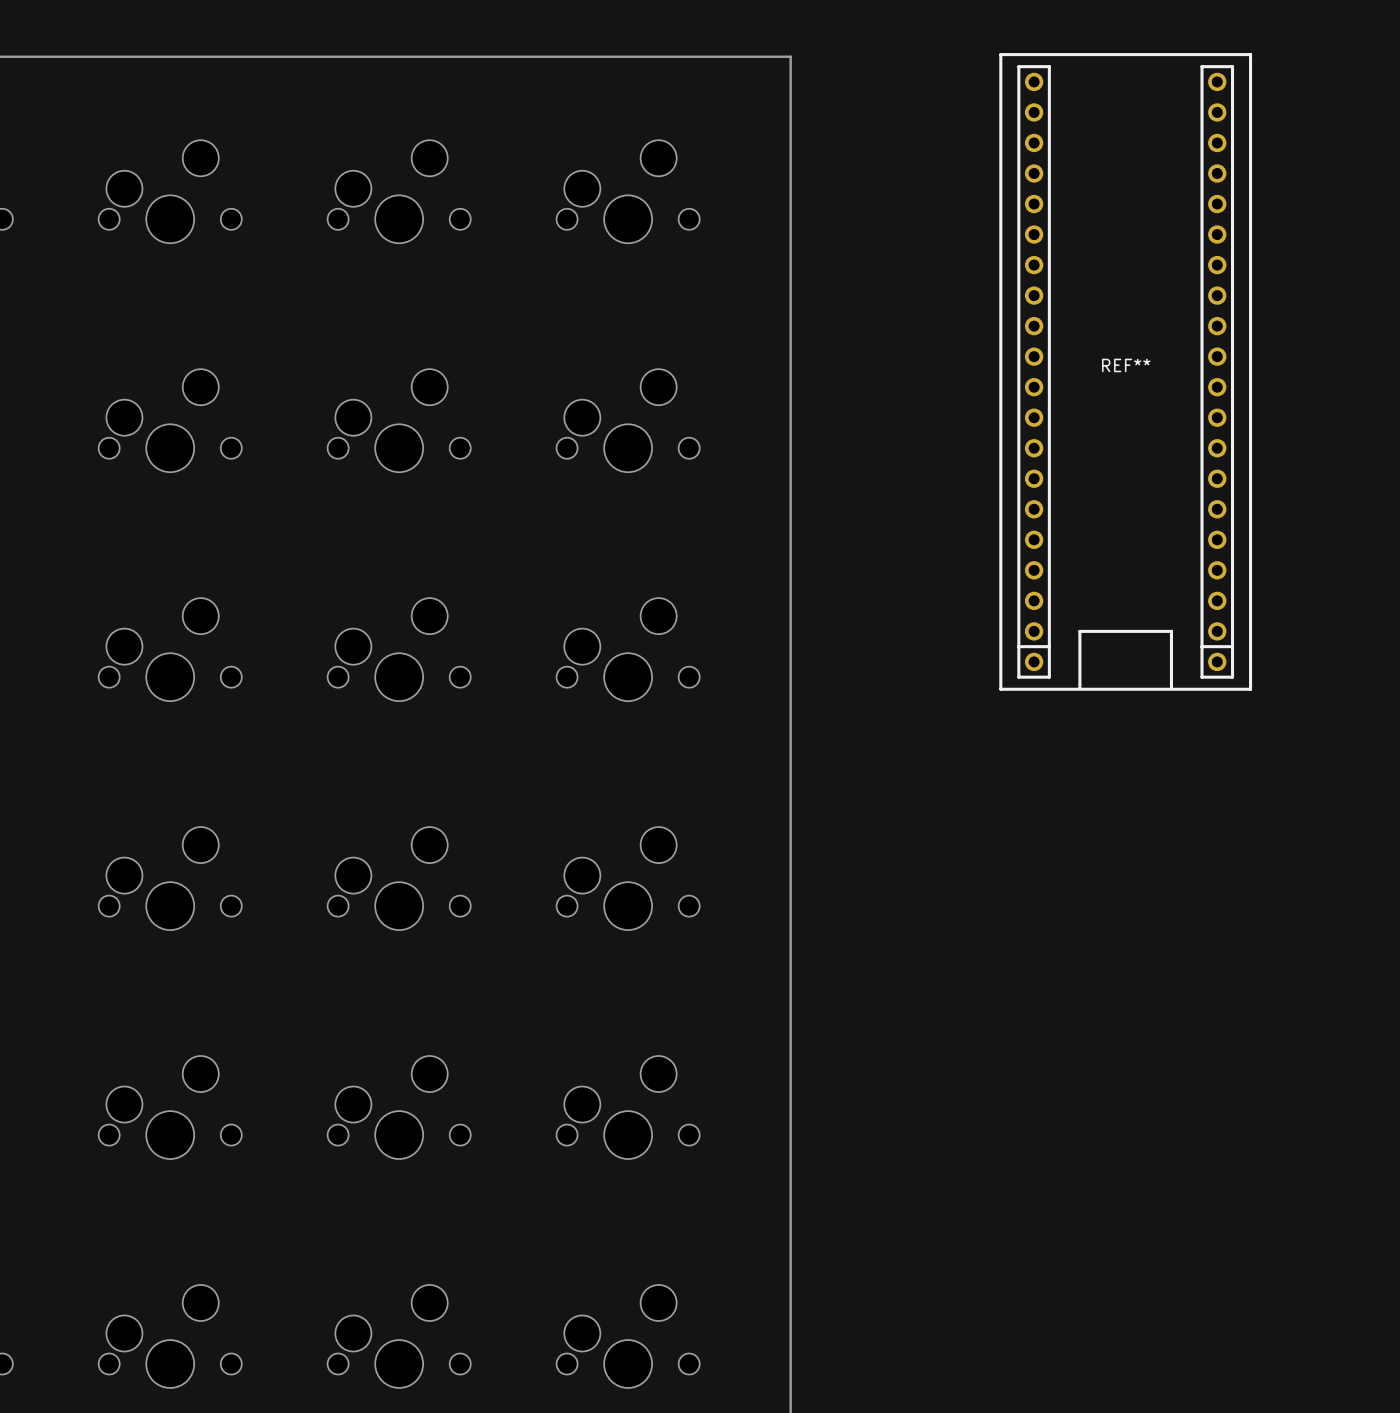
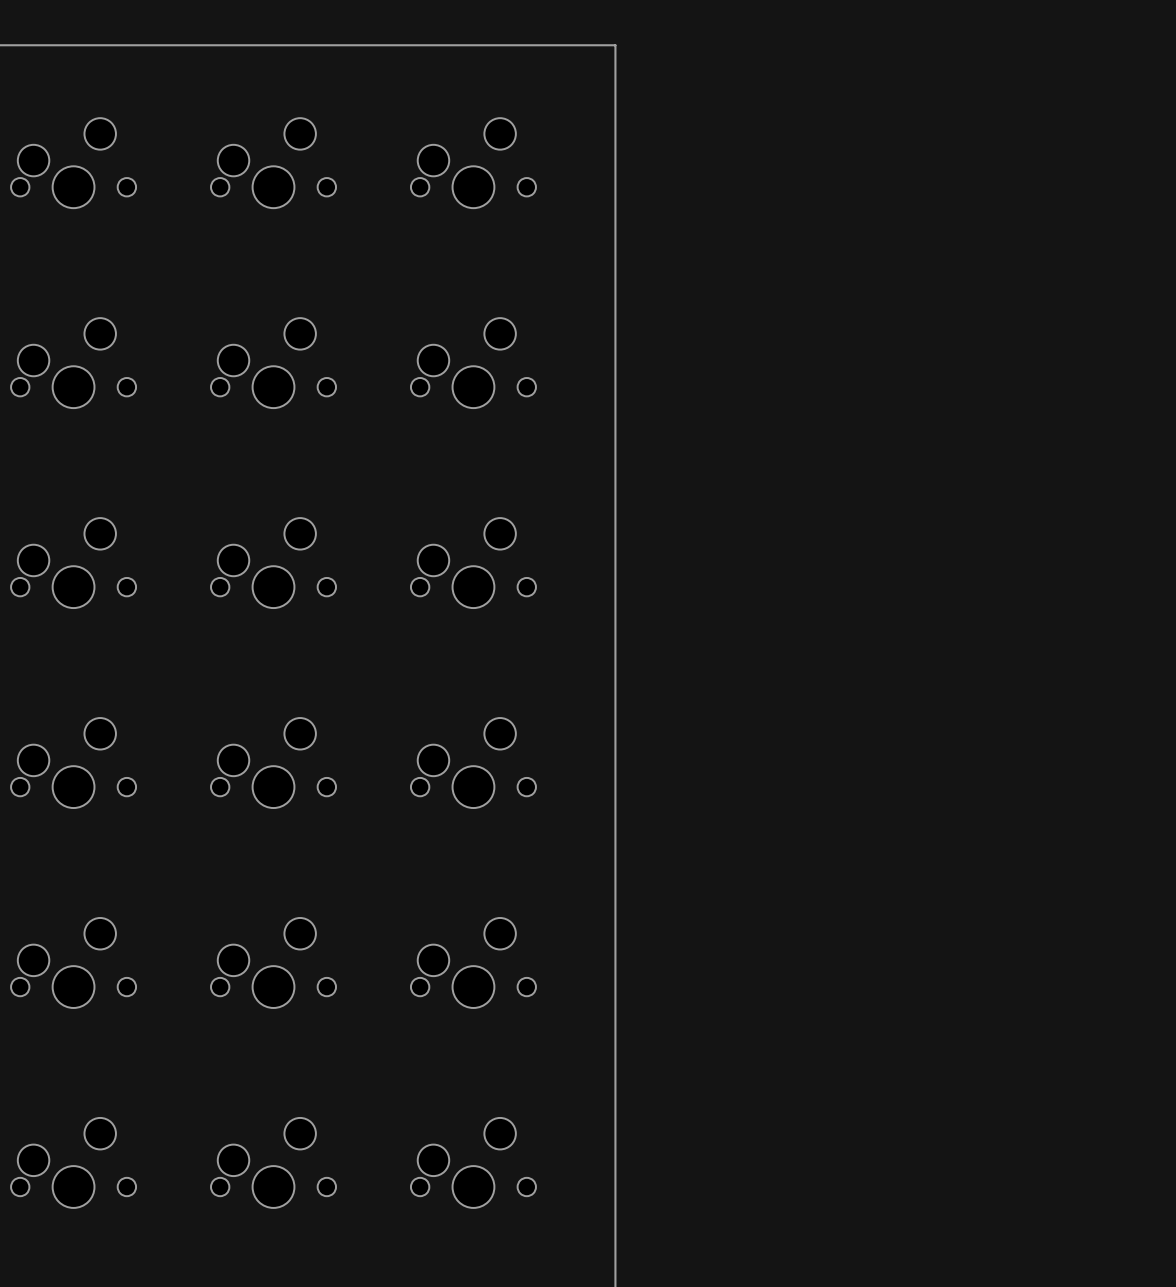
REF**: (1125, 371) -> none

